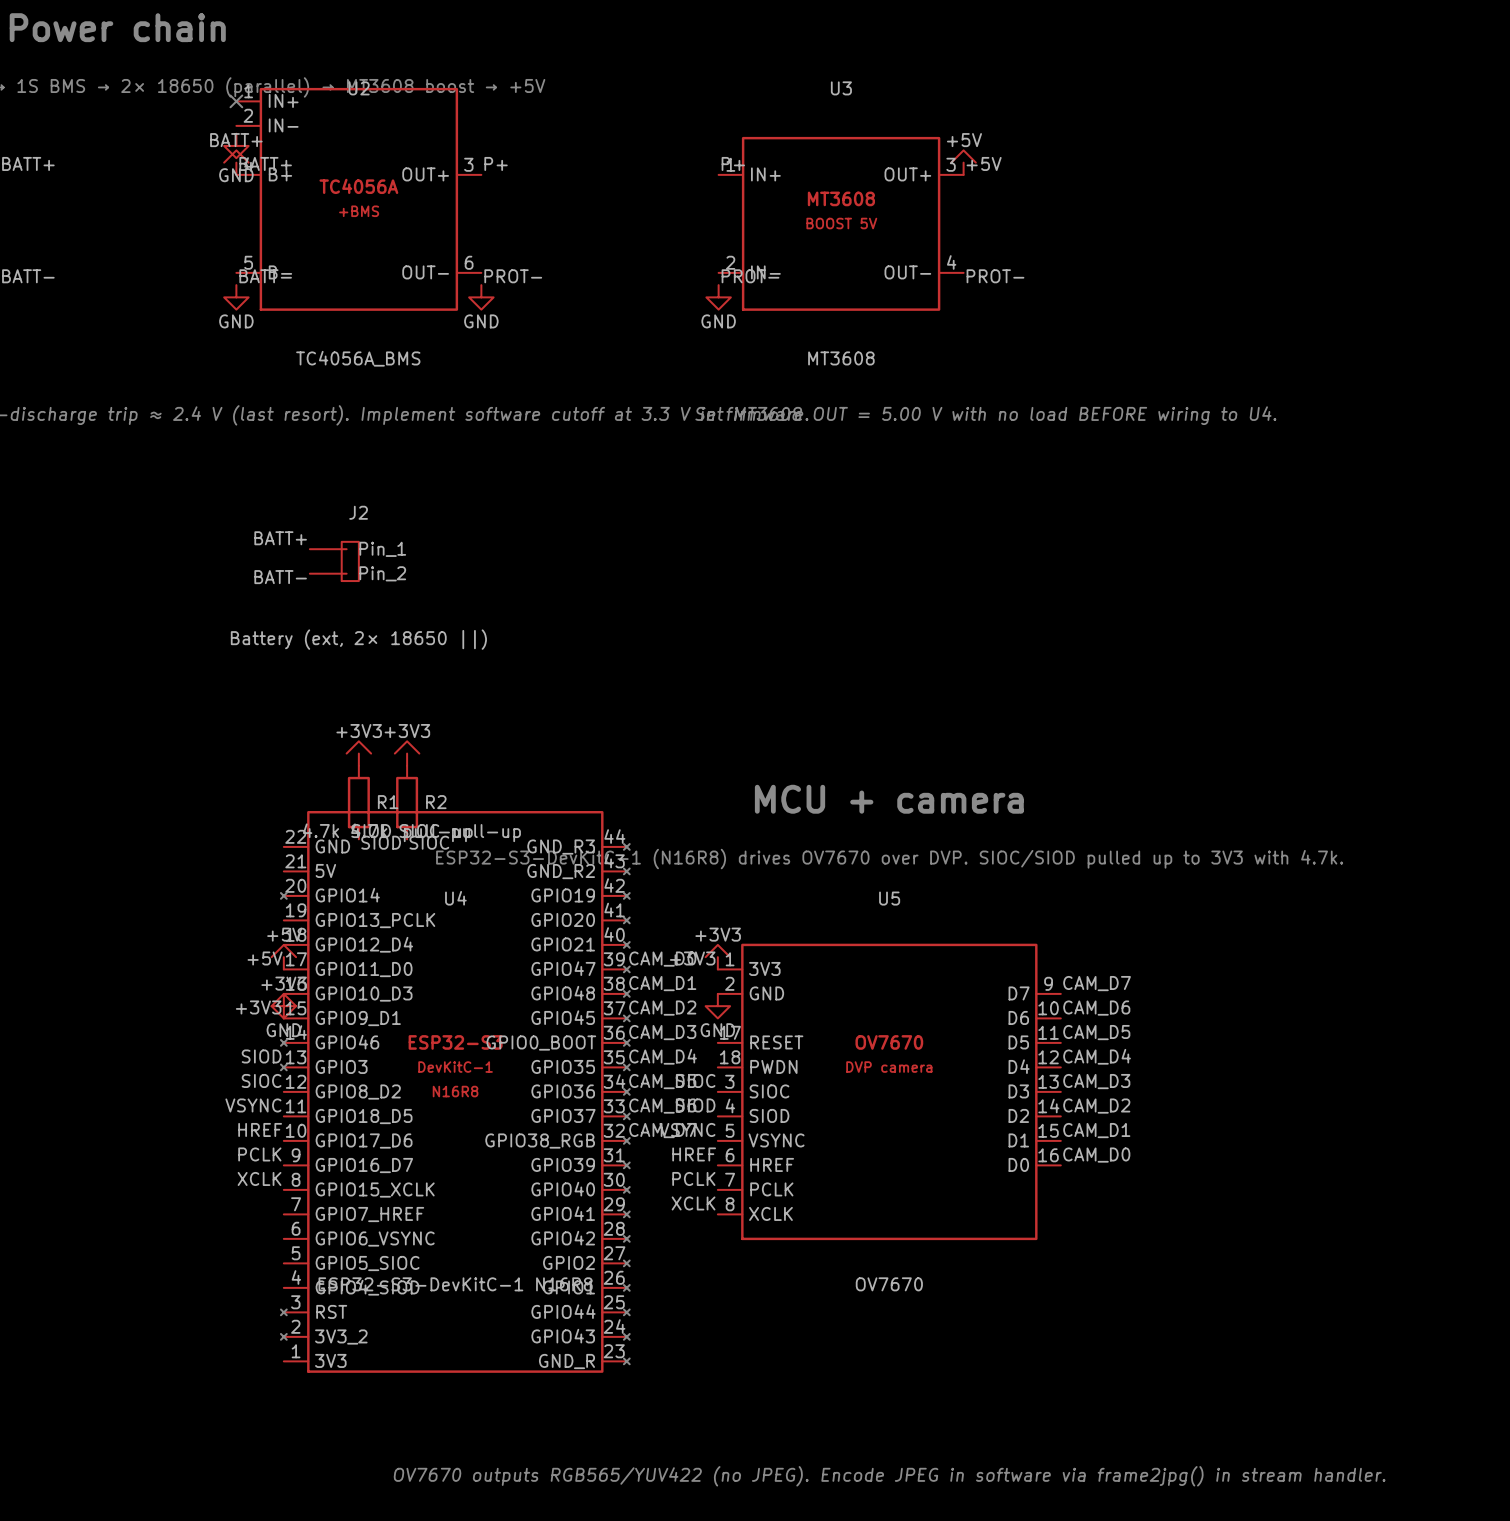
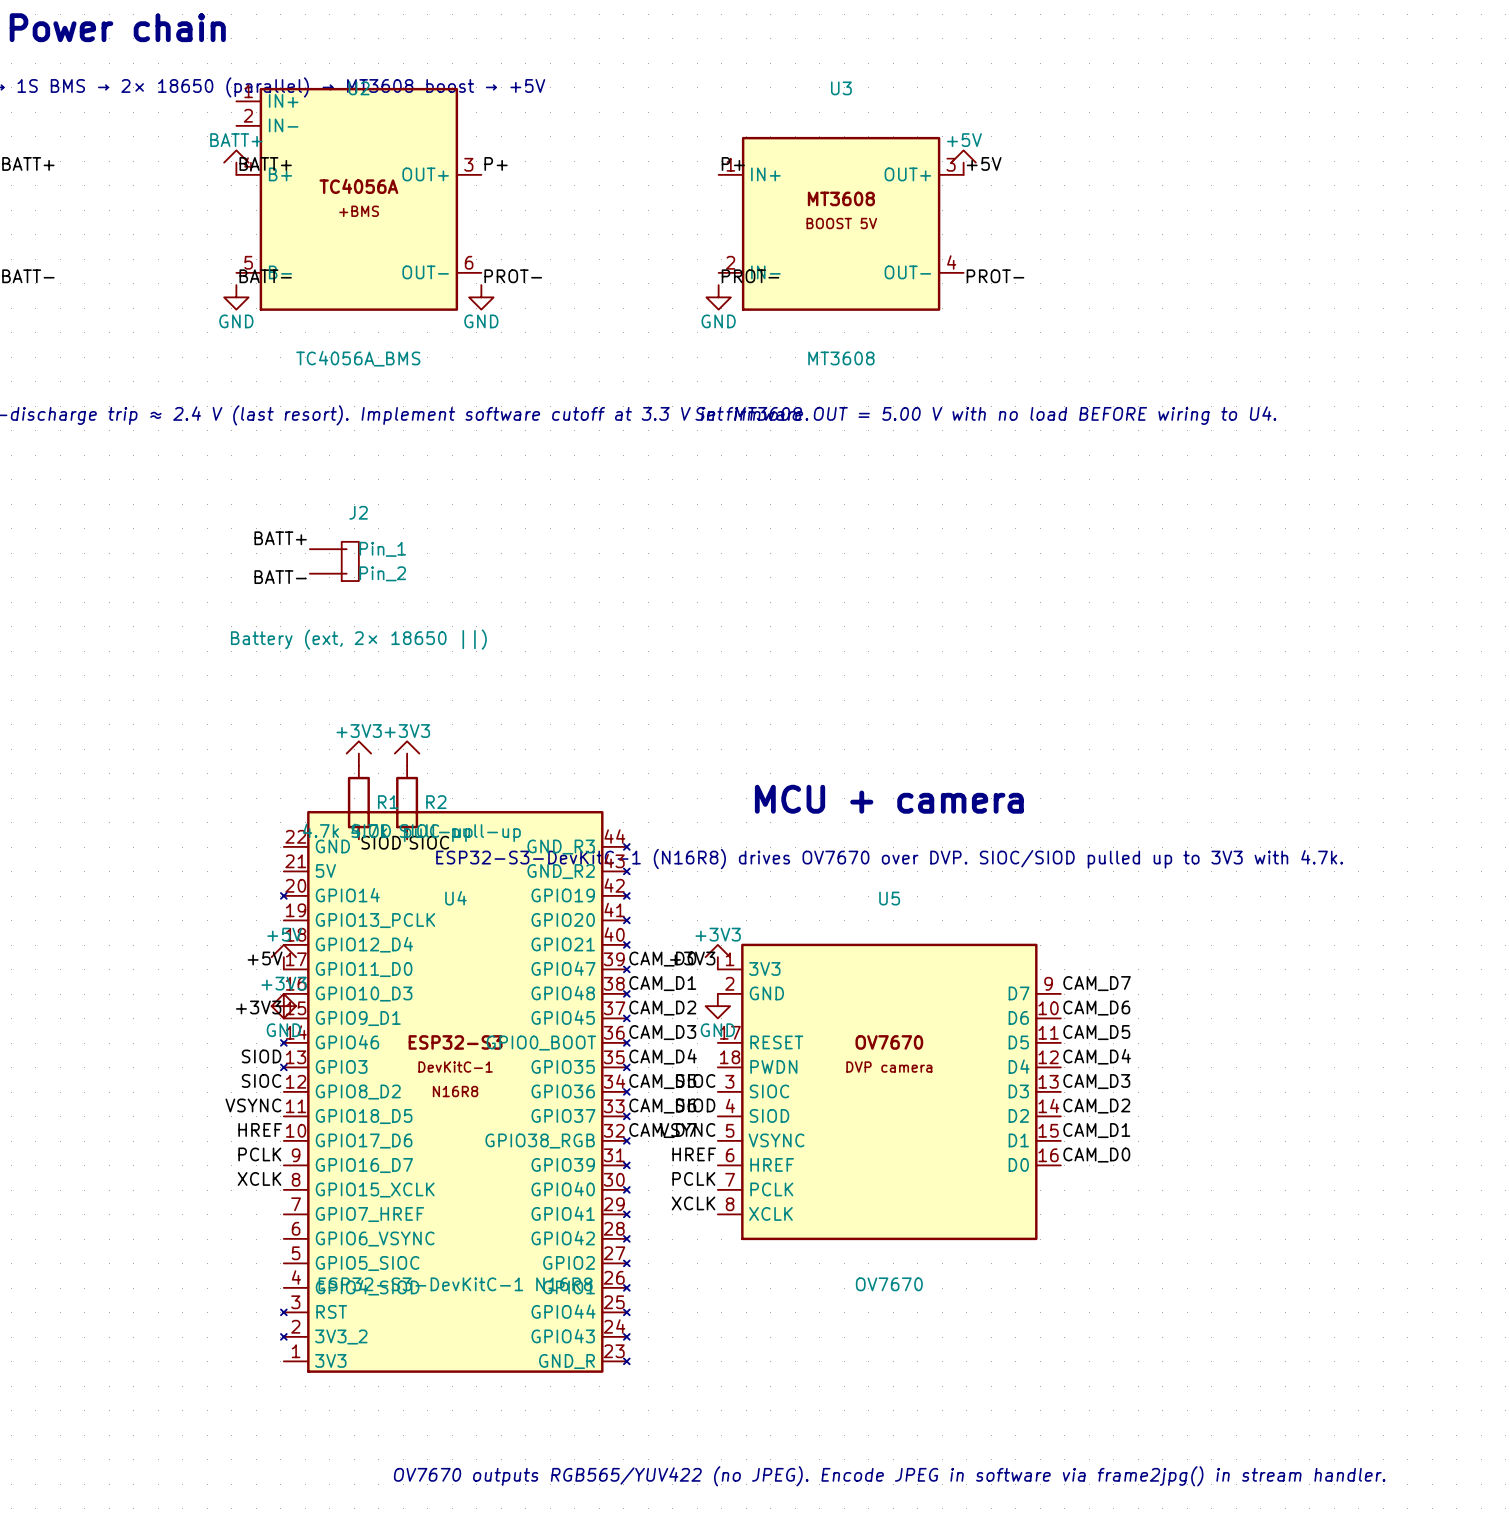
no-connect mark: (236, 101) -> none
power symbol: GND (236, 145) -> none

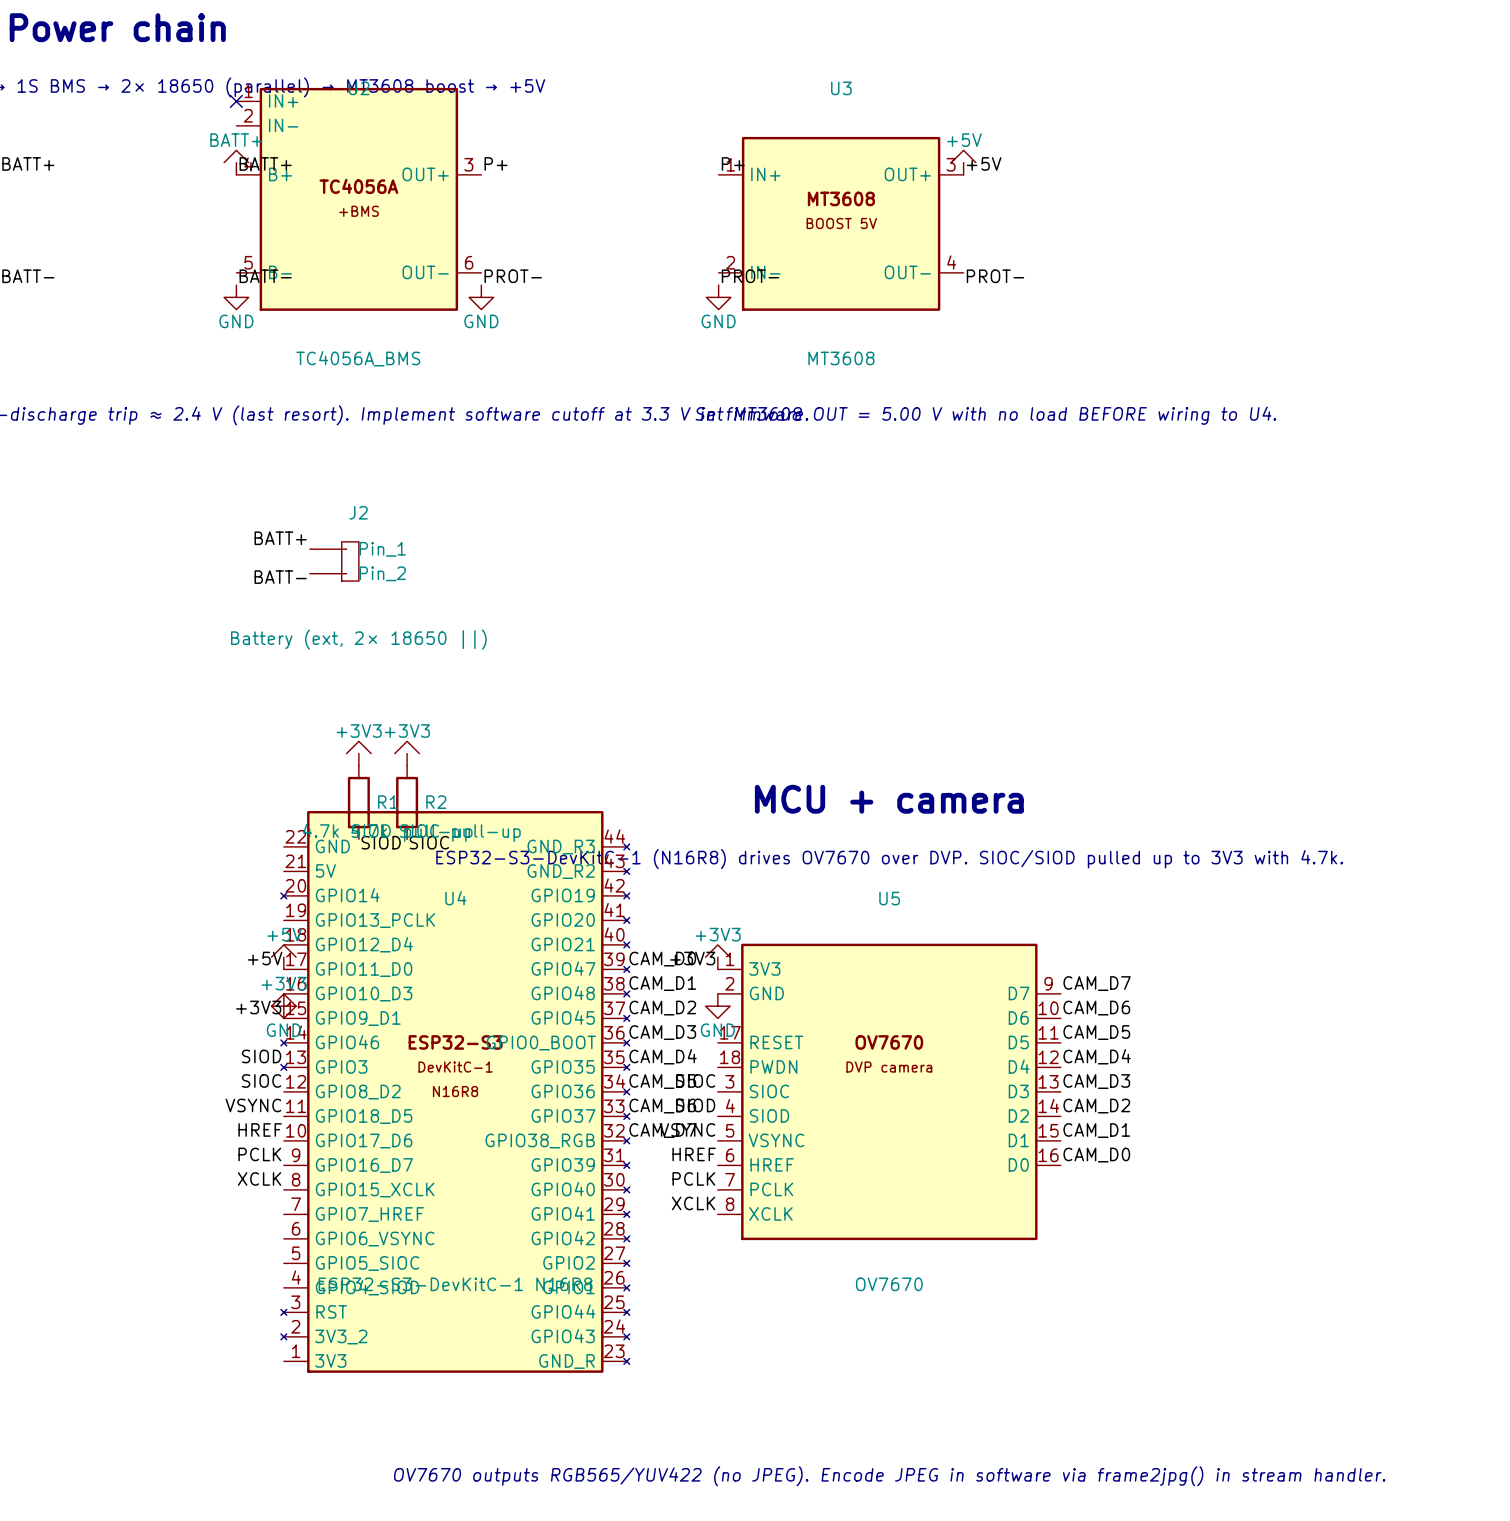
no-connect mark: none -> (236, 101)

